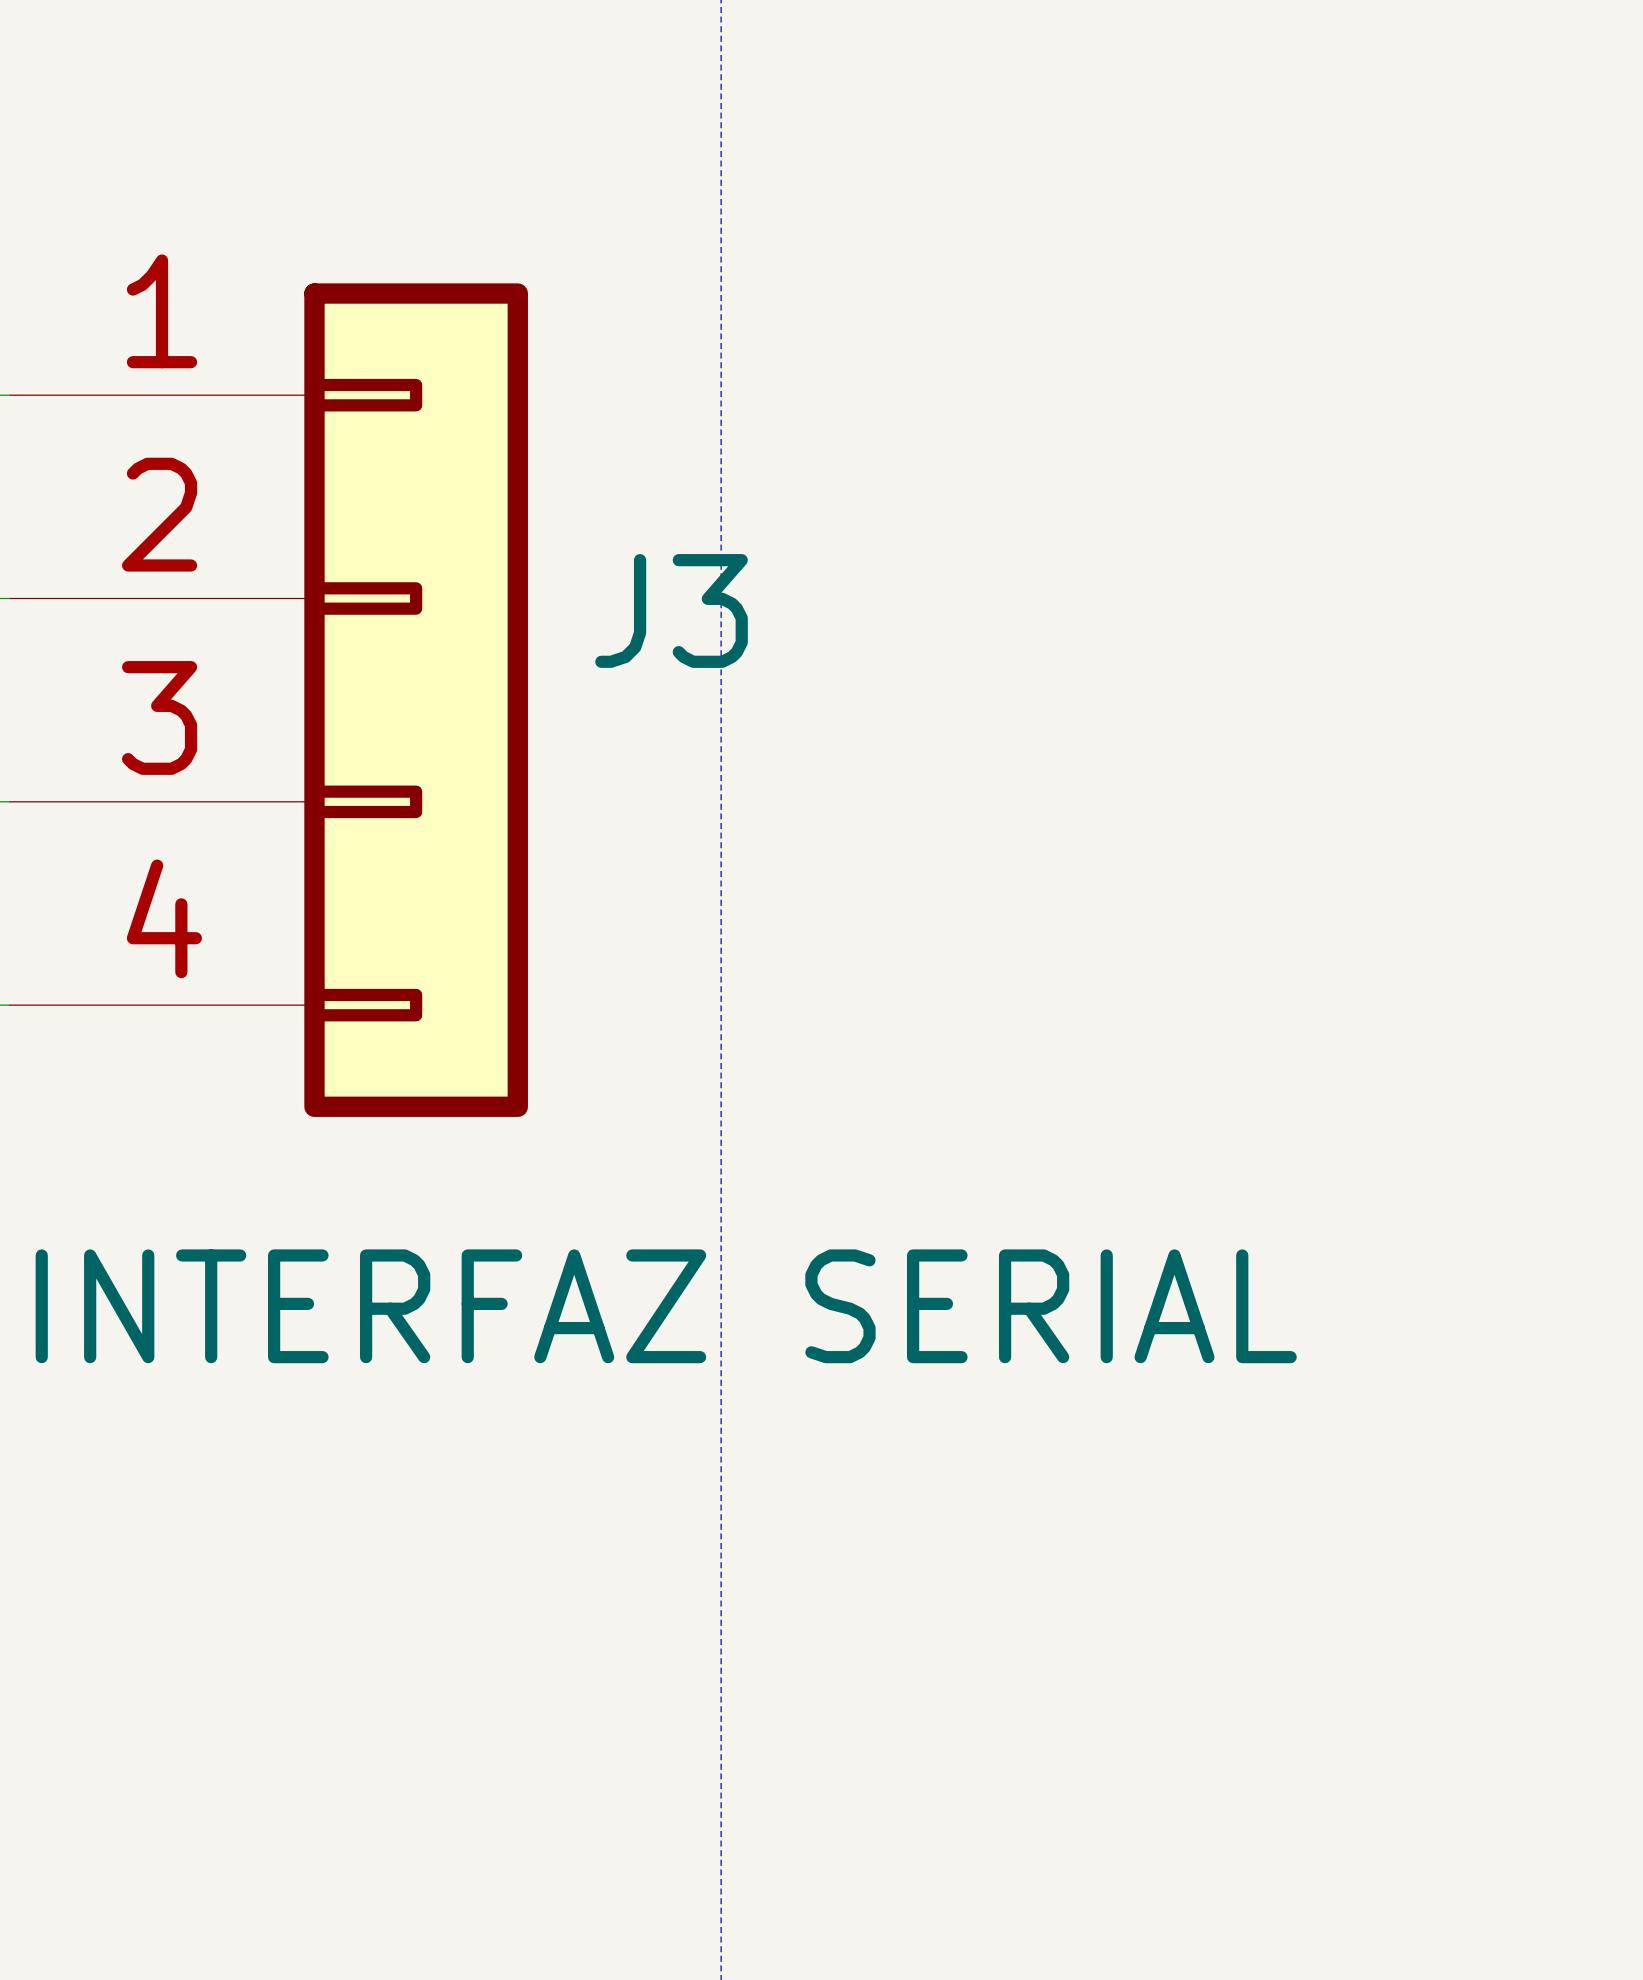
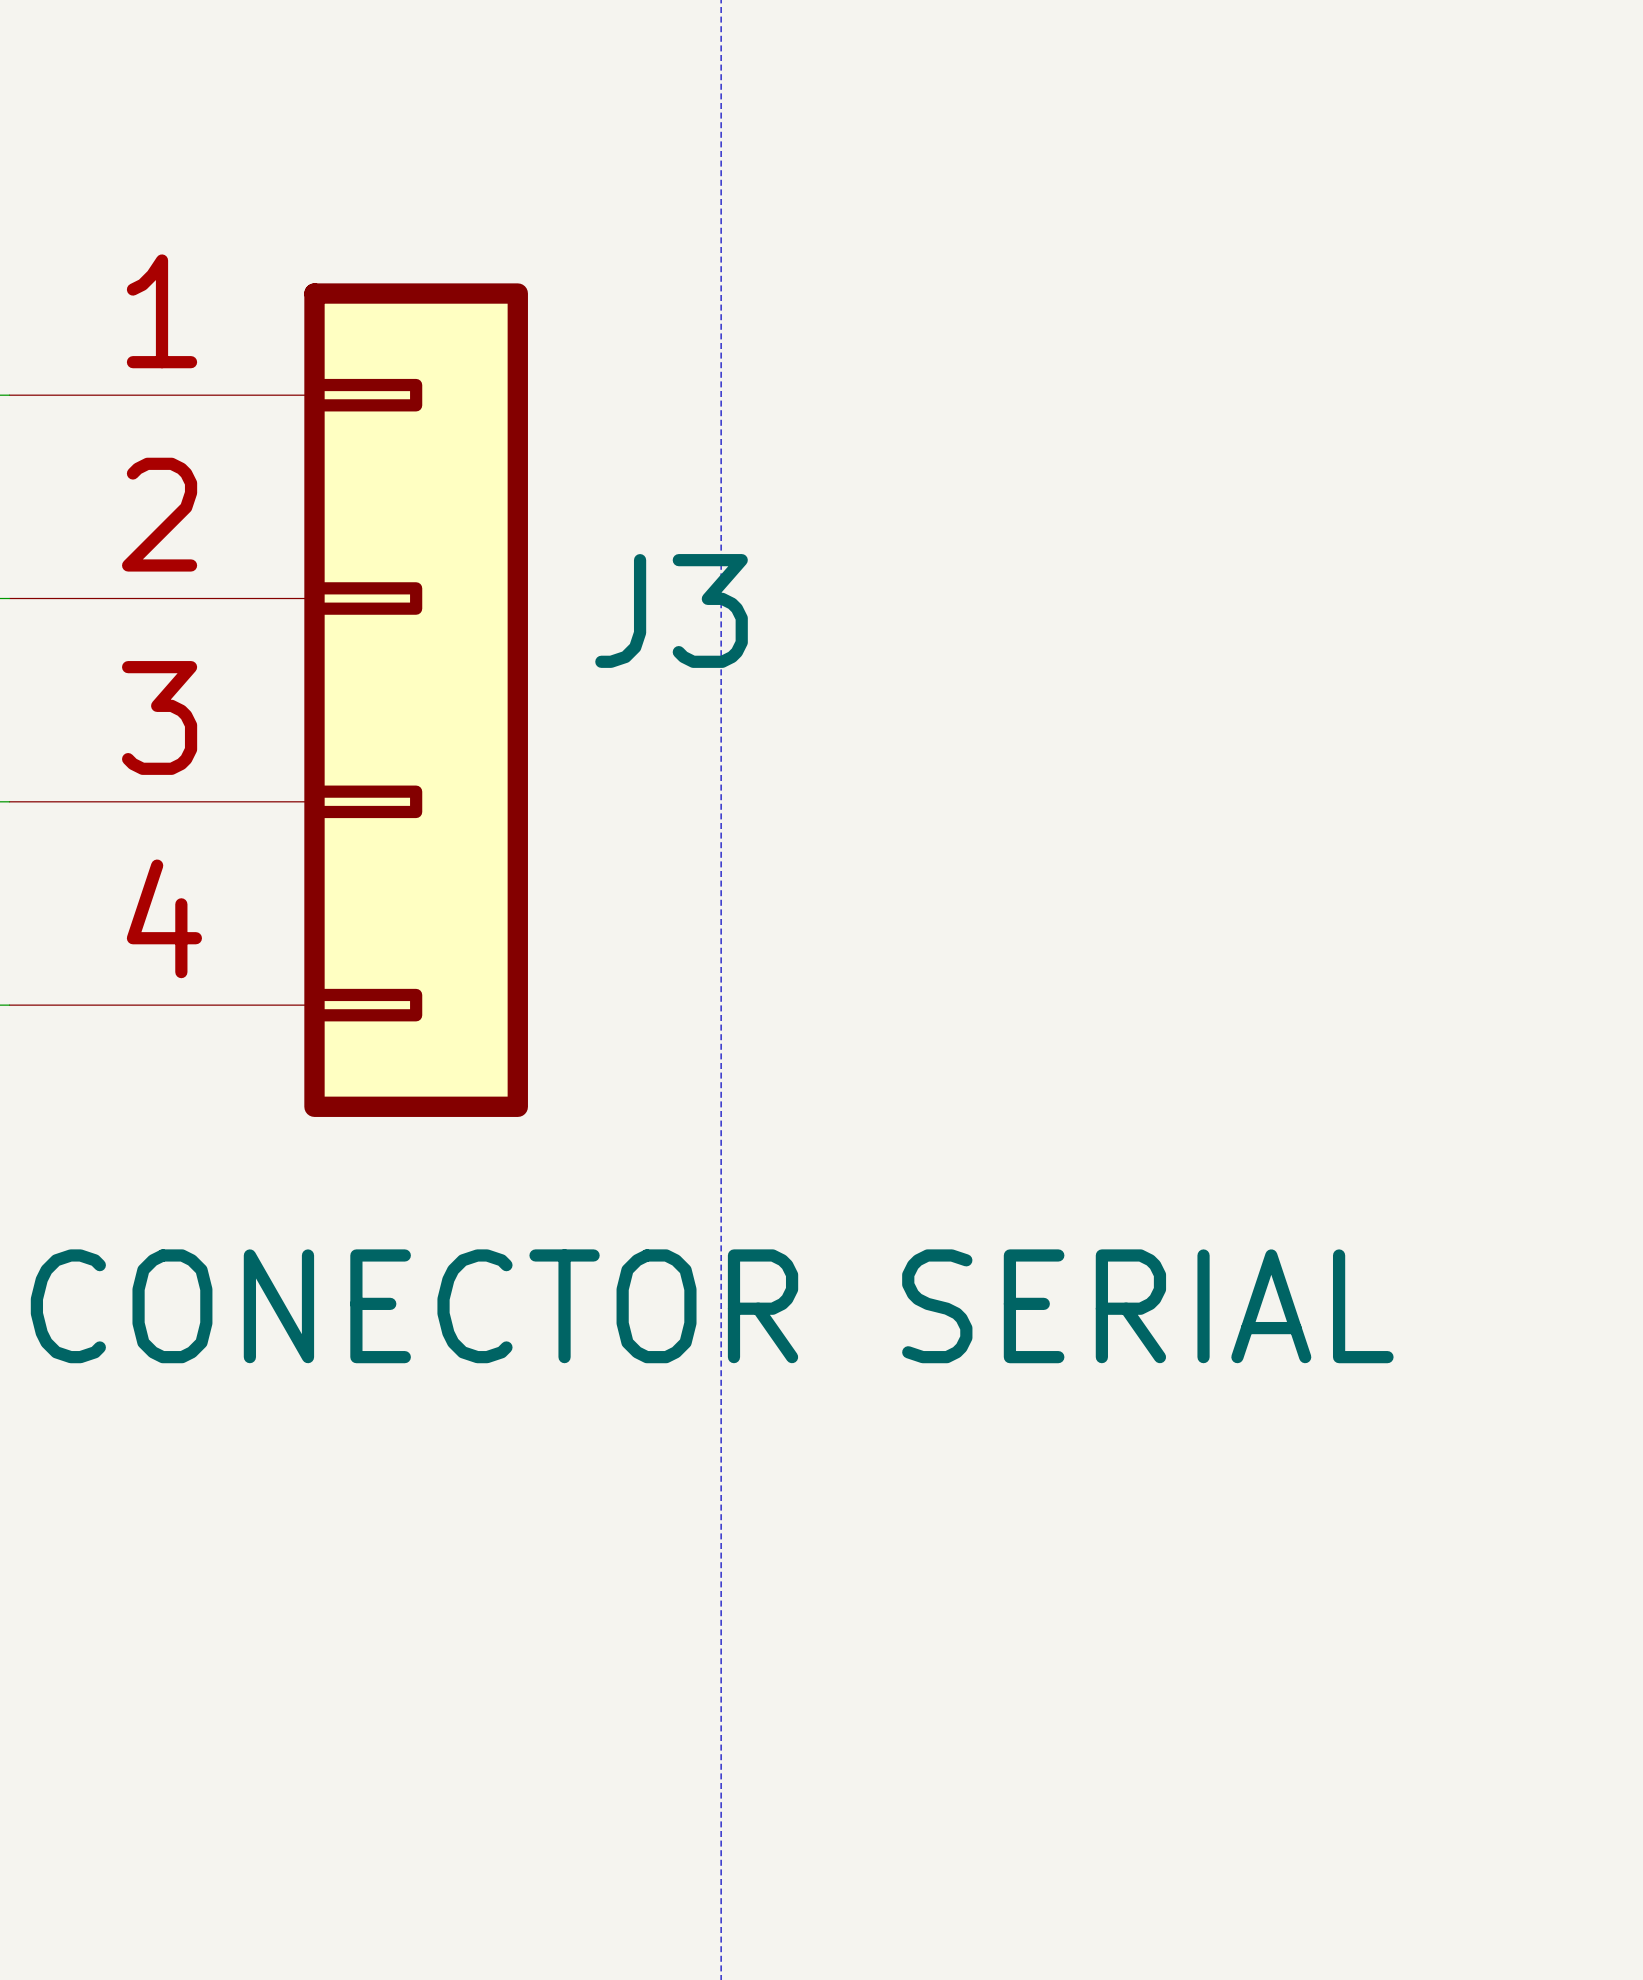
J3 value: INTERFAZ SERIAL (666, 1306) -> CONECTOR SERIAL (712, 1306)

